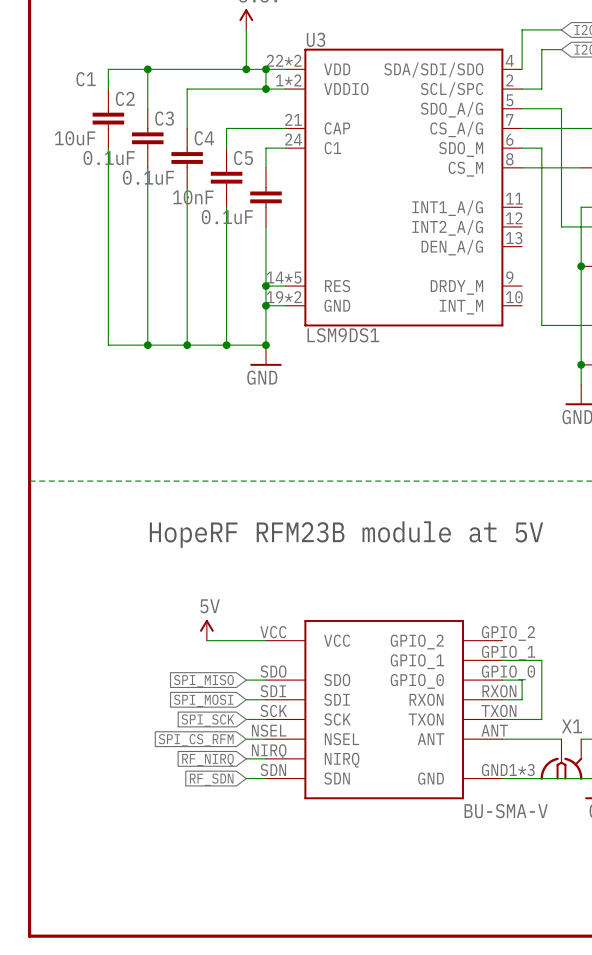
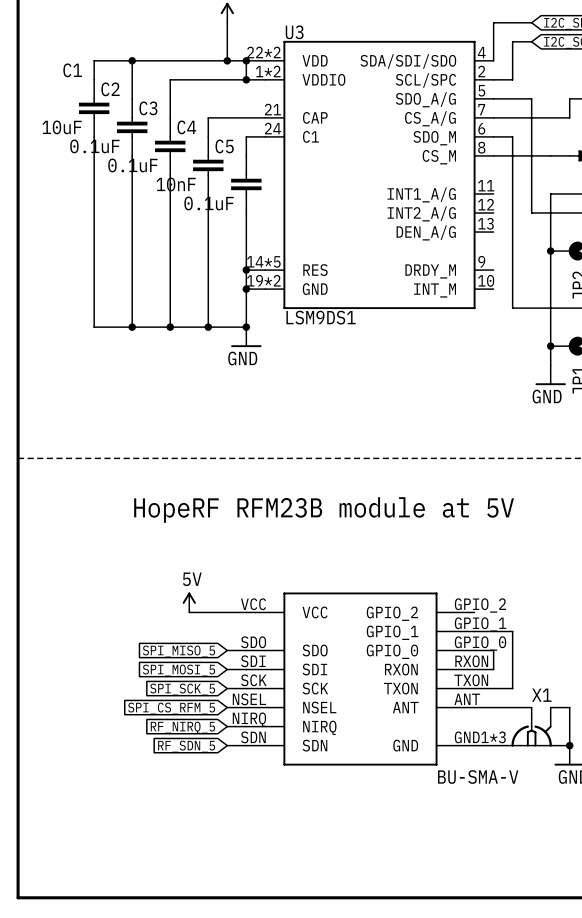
global label: SPI_MISO (203, 681) -> SPI_MISO_5 (178, 651)
global label: SPI_MOSI (203, 700) -> SPI_MOSI_5 (178, 670)
global label: SPI_SCK (207, 720) -> SPI_SCK_5 (182, 689)
global label: SPI_CS_RFM (196, 740) -> SPI_CS_RFM_5 (171, 708)
global label: RF_NIRQ (208, 759) -> RF_NIRQ_5 (182, 727)
global label: RF_SDN (211, 779) -> RF_SDN_5 (186, 746)

